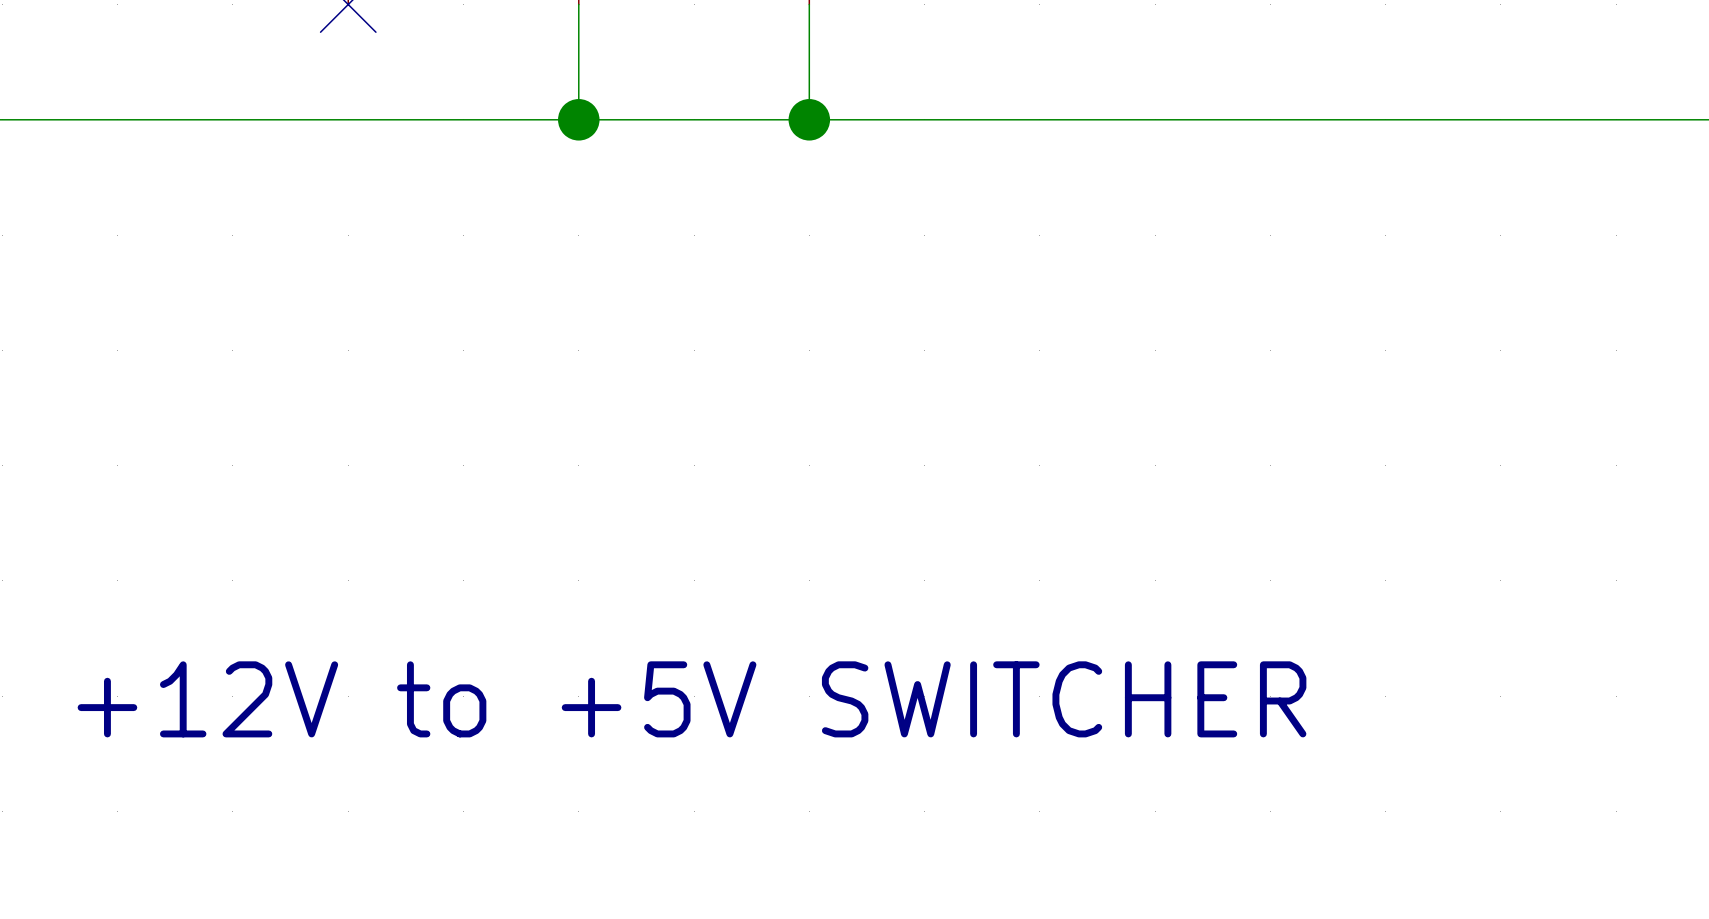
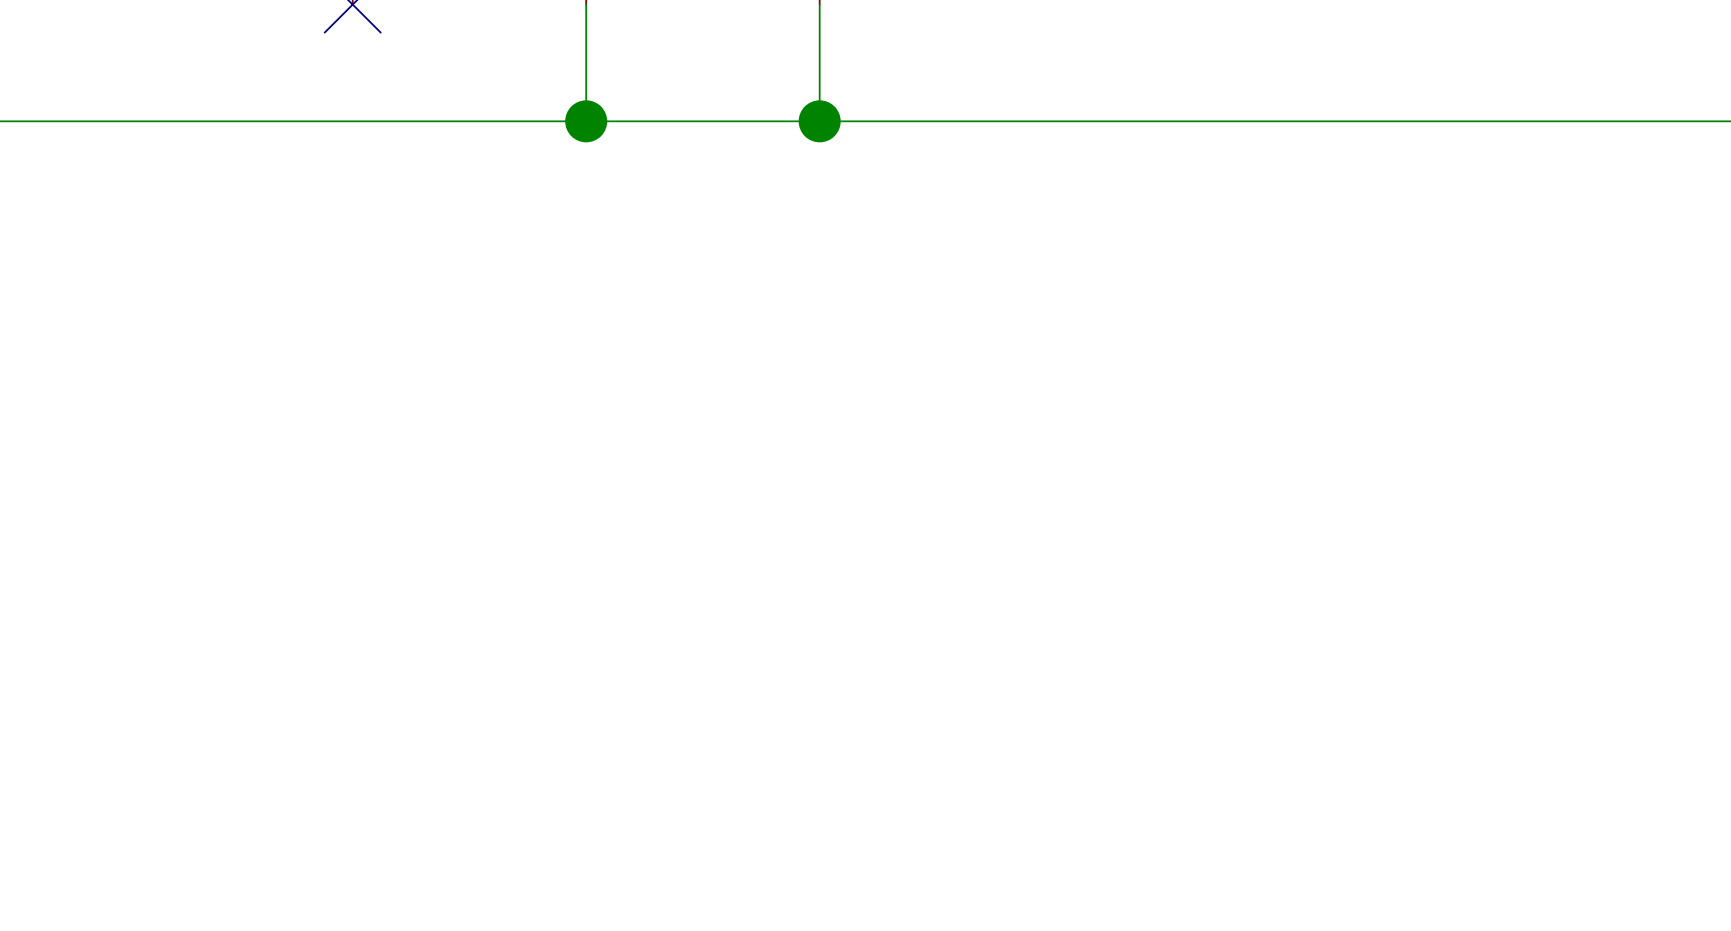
text: +12V to +5V SWITCHER (692, 699) -> none

